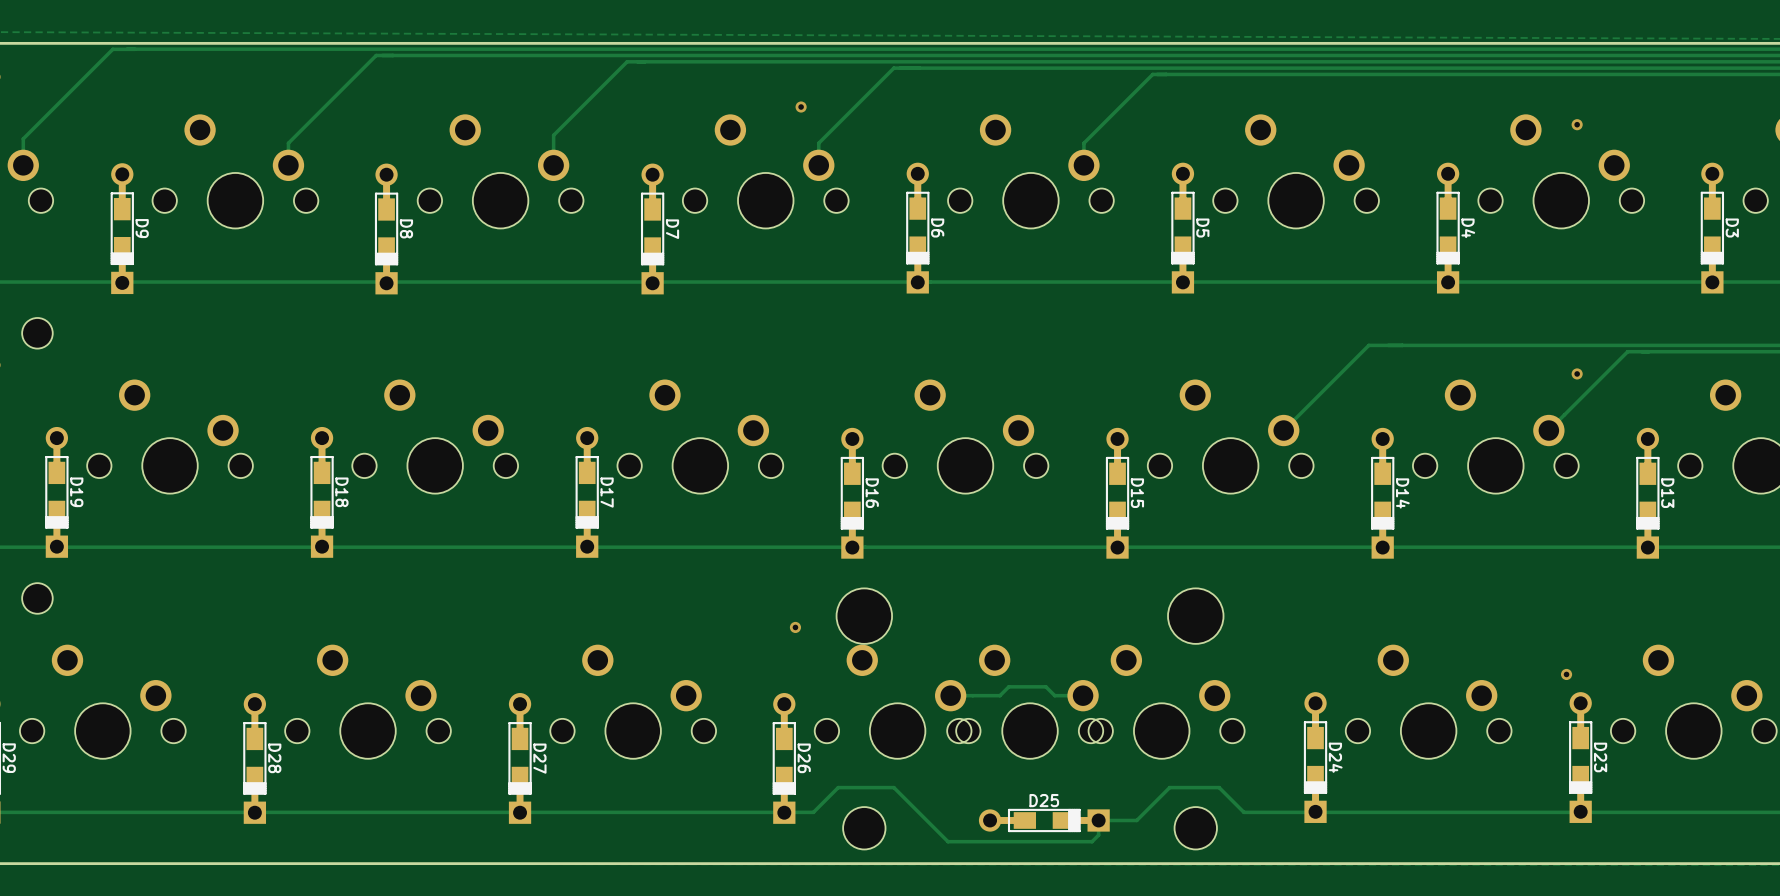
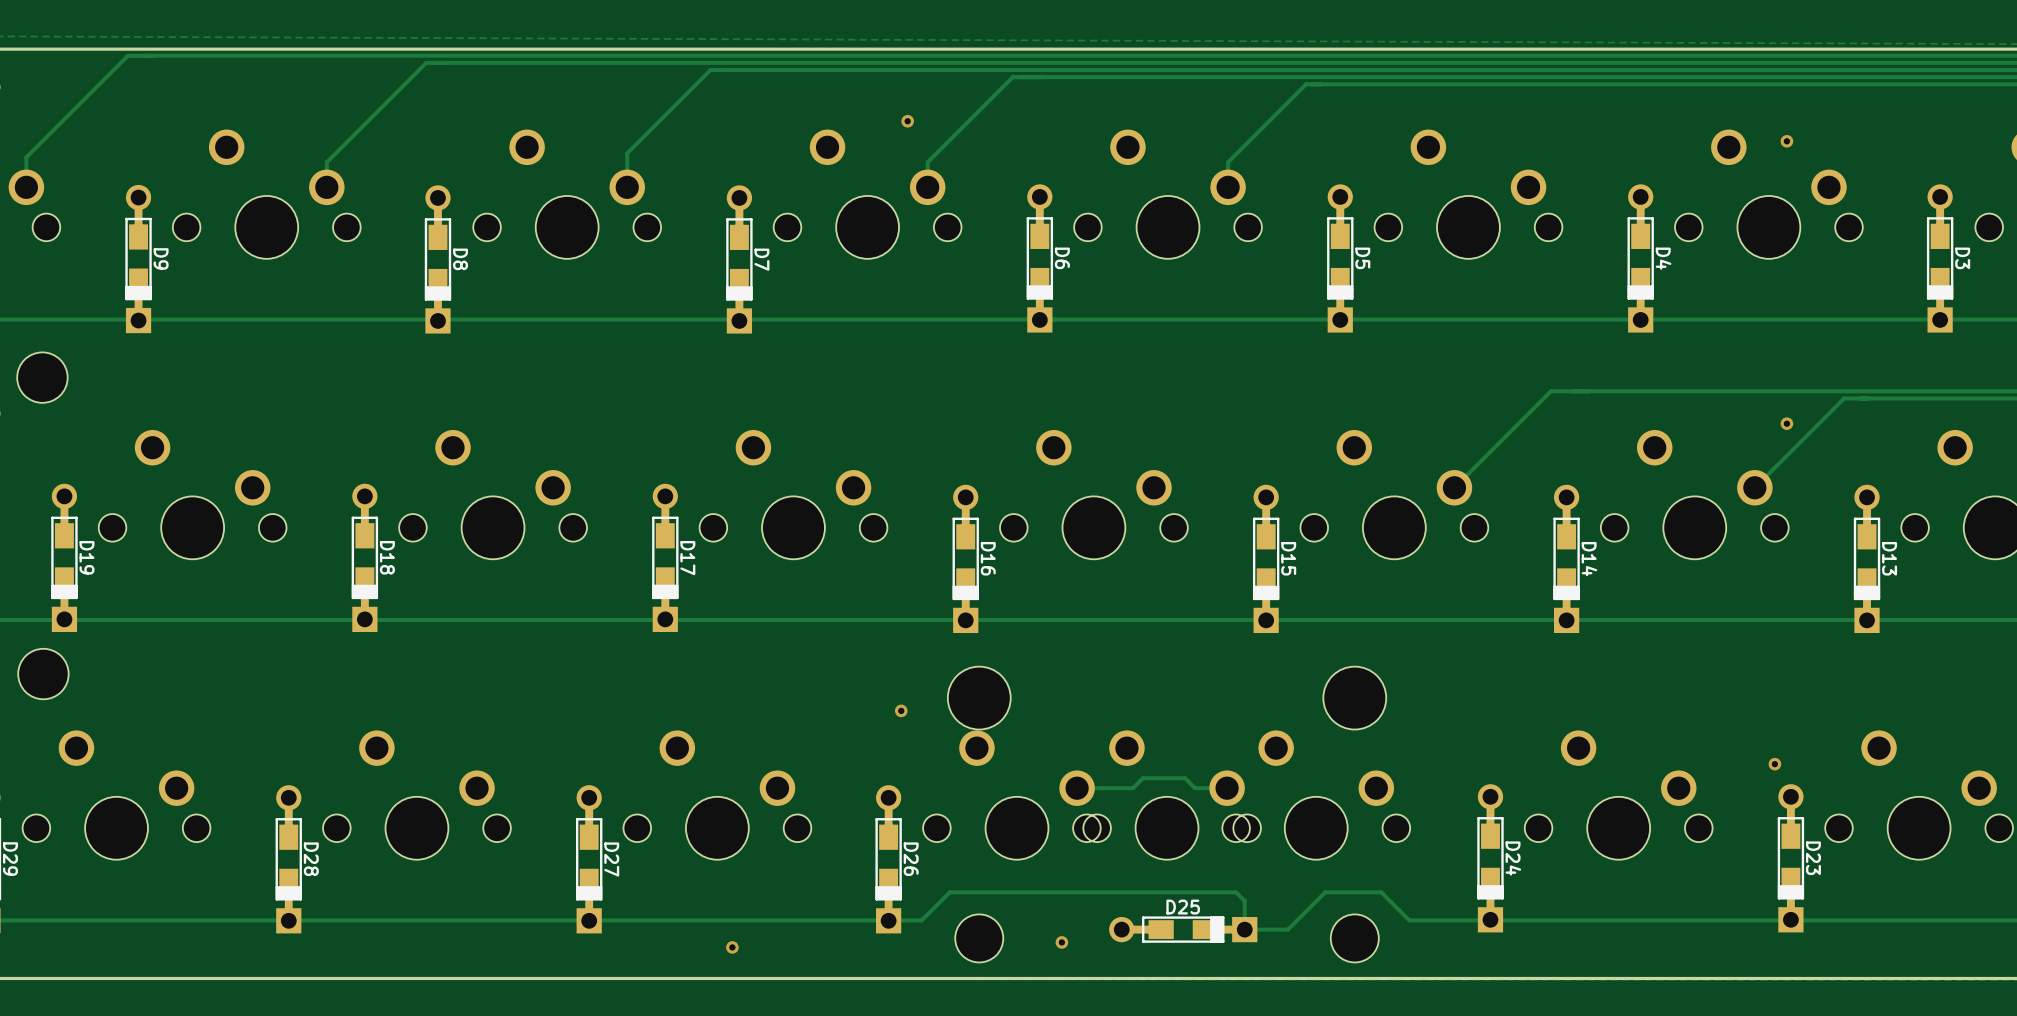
part footprint: [22, 317, 53, 349] -> [17, 352, 68, 403]
part footprint: [22, 583, 53, 614] -> [18, 648, 69, 700]
track: (893, 787) (948, 841) (1092, 841) (1098, 835) (1098, 820) -> (1012, 892) (1236, 892) (1244, 900) (1244, 929)
via: none -> (1061, 942)
via: none -> (732, 947)

